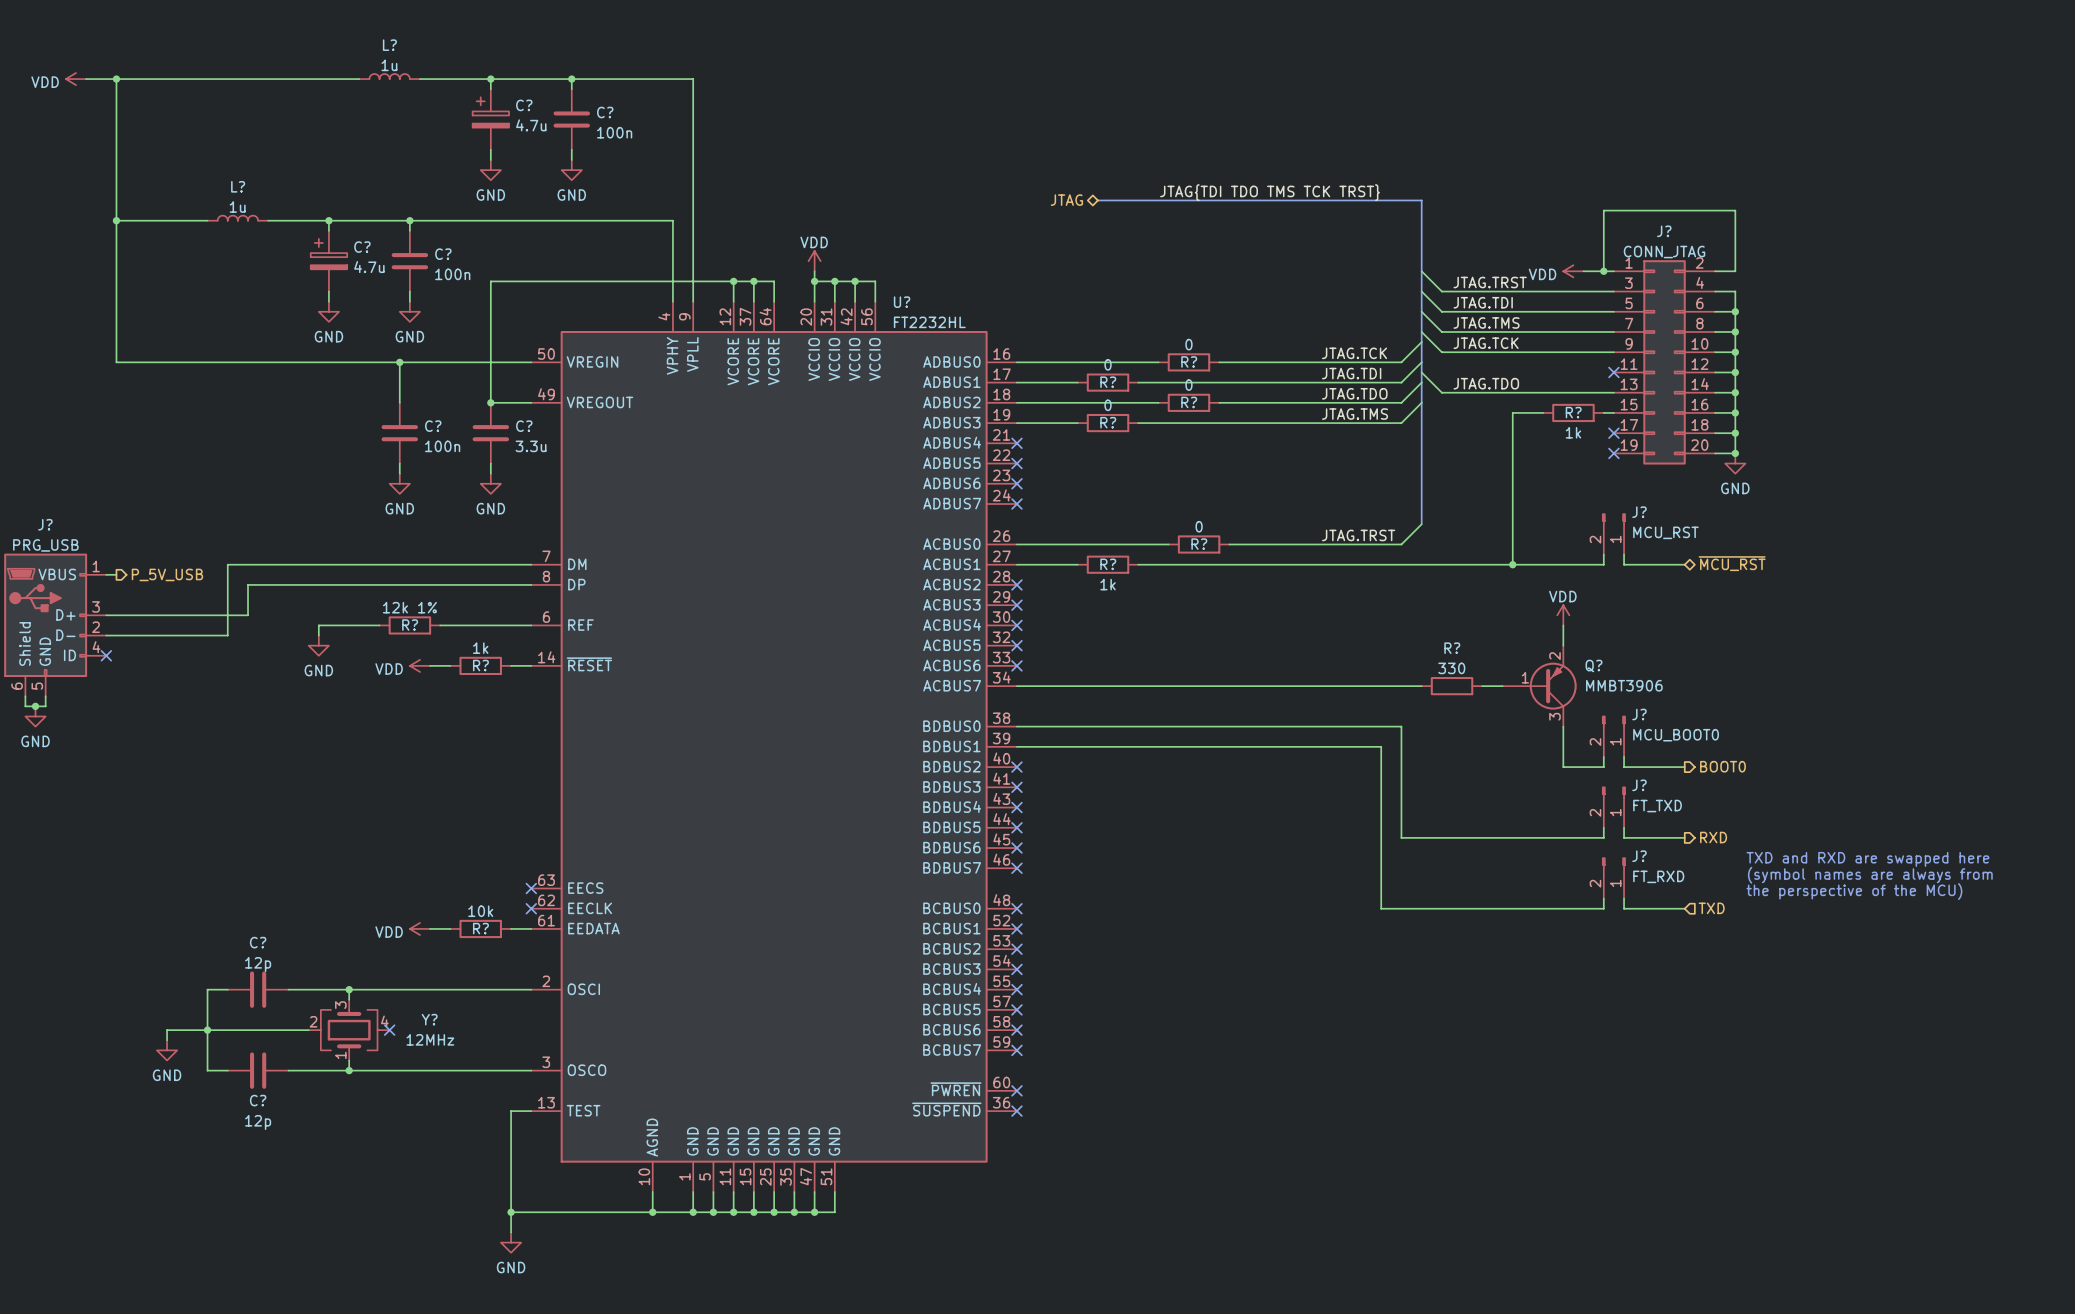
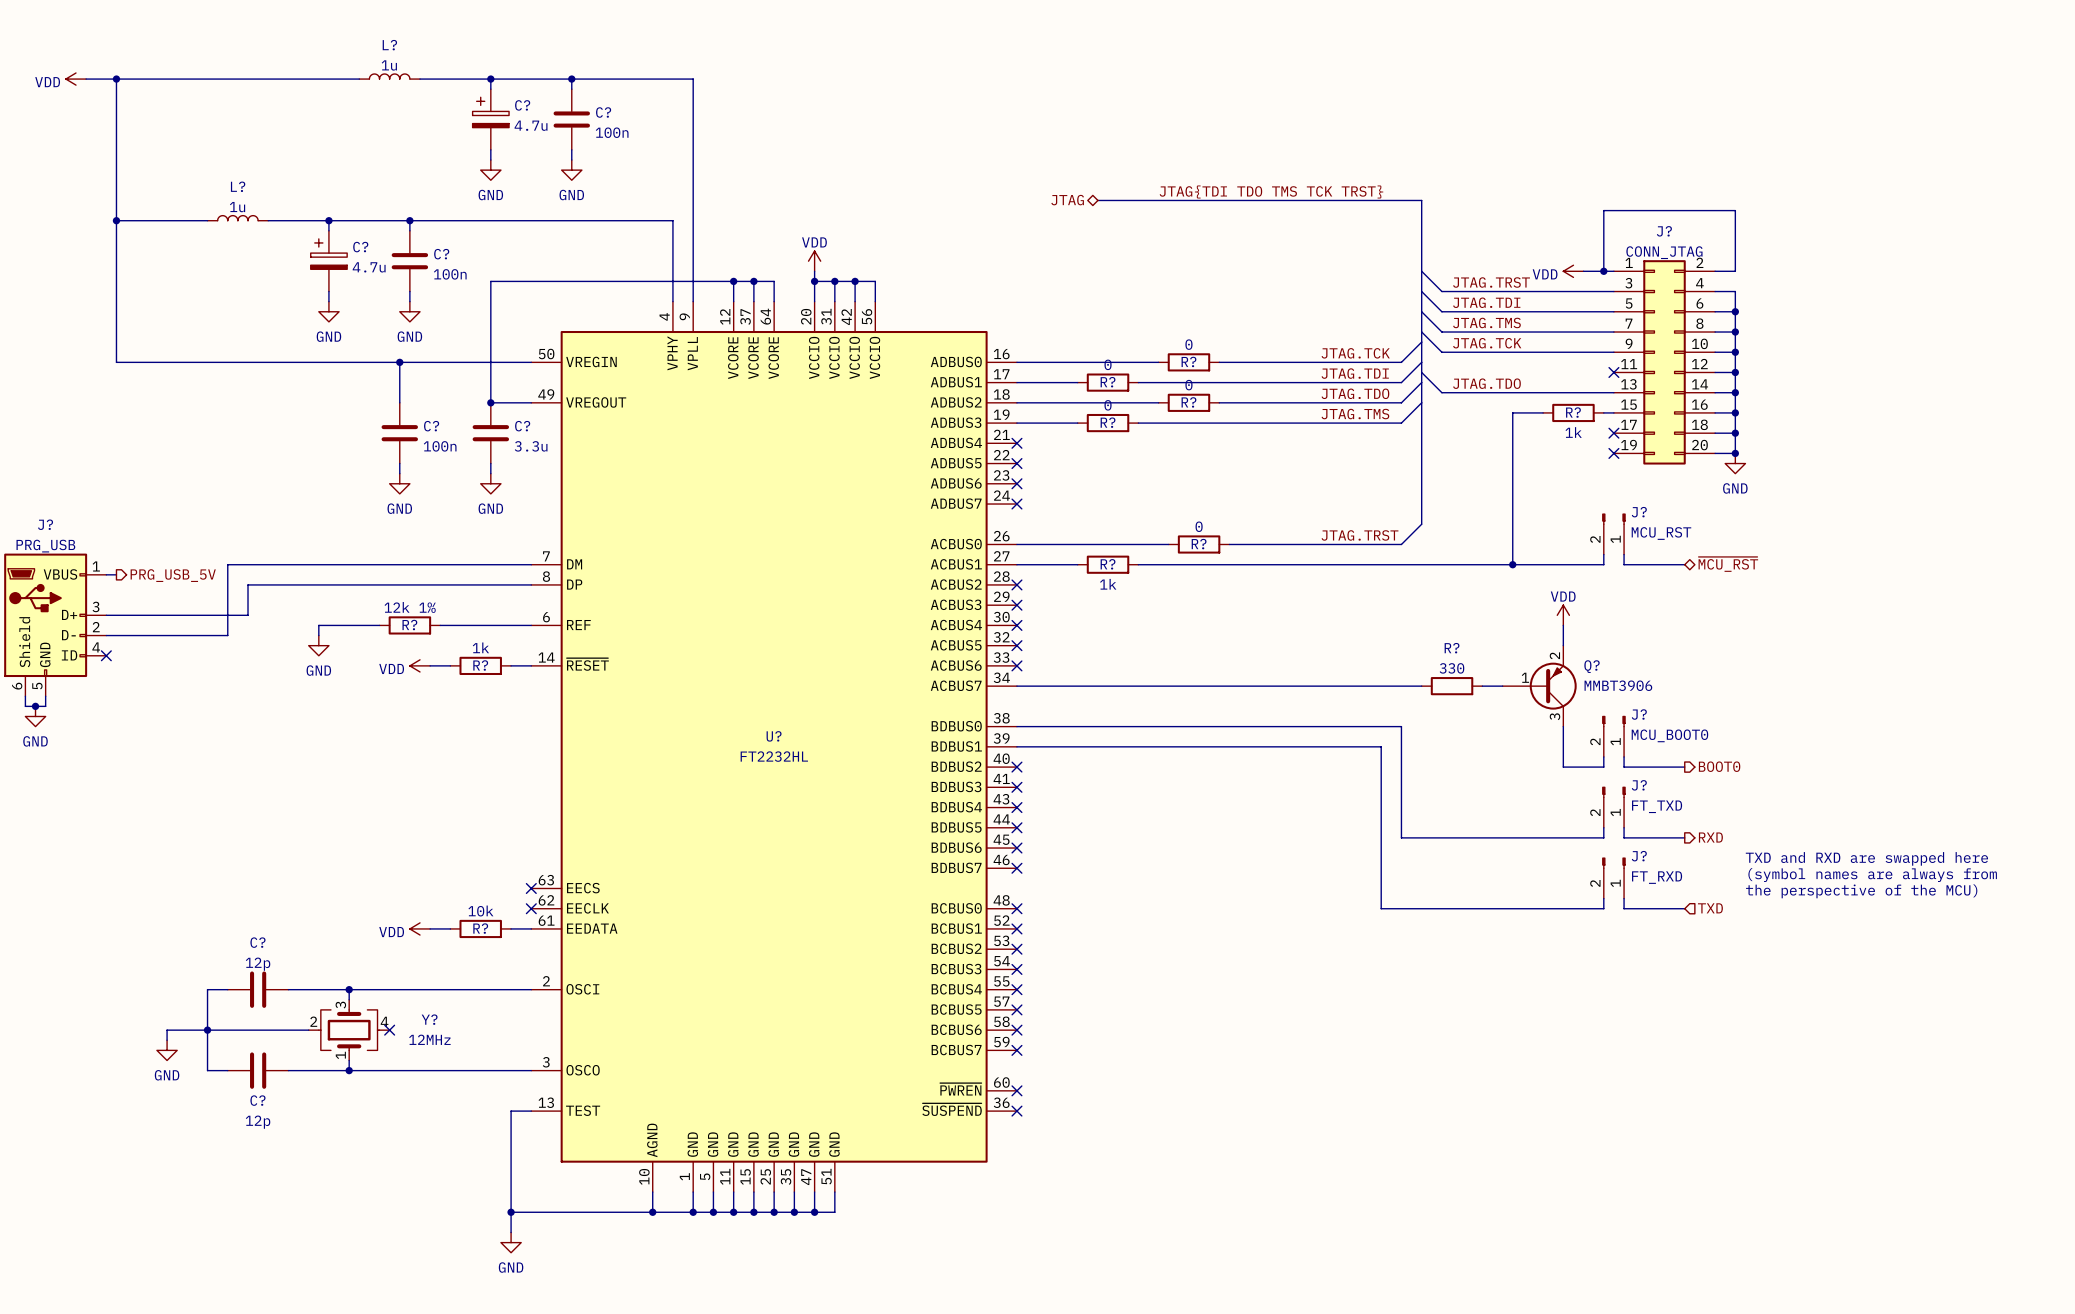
U? name position: U? (902, 302) -> U? (774, 736)
U? value position: FT2232HL (929, 322) -> FT2232HL (774, 756)
hierarchical label: P_5V_USB (167, 574) -> PRG_USB_5V (173, 575)

